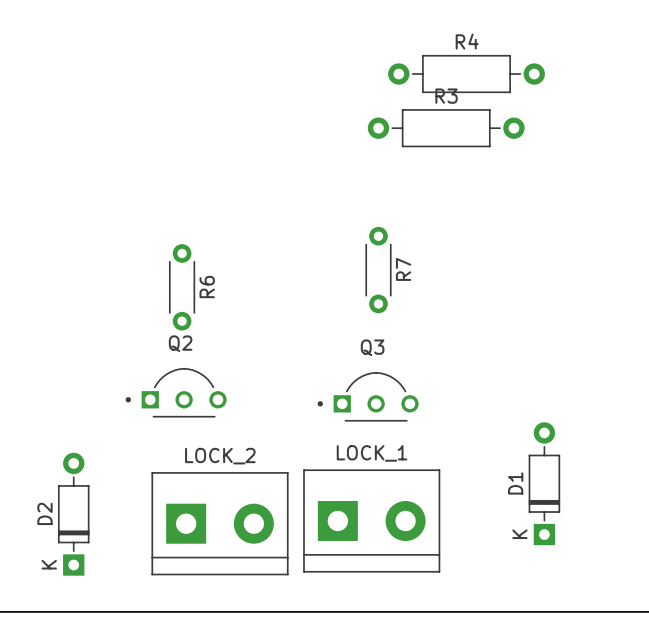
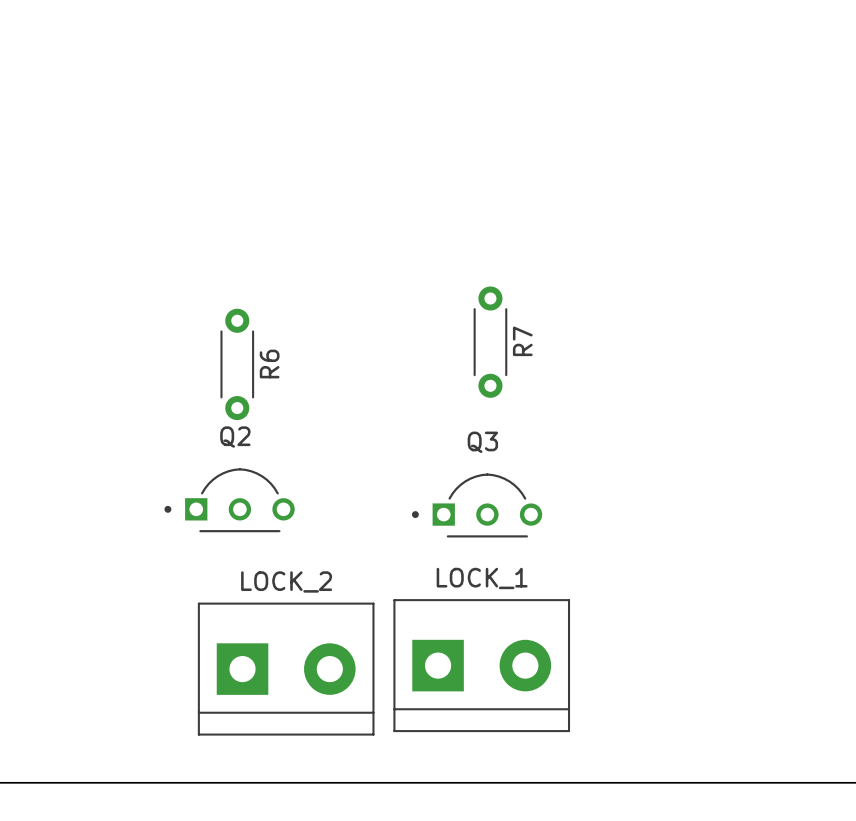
R4: (466, 74) -> none
R3: (446, 128) -> none
D1: (544, 483) -> none
D2: (73, 514) -> none

